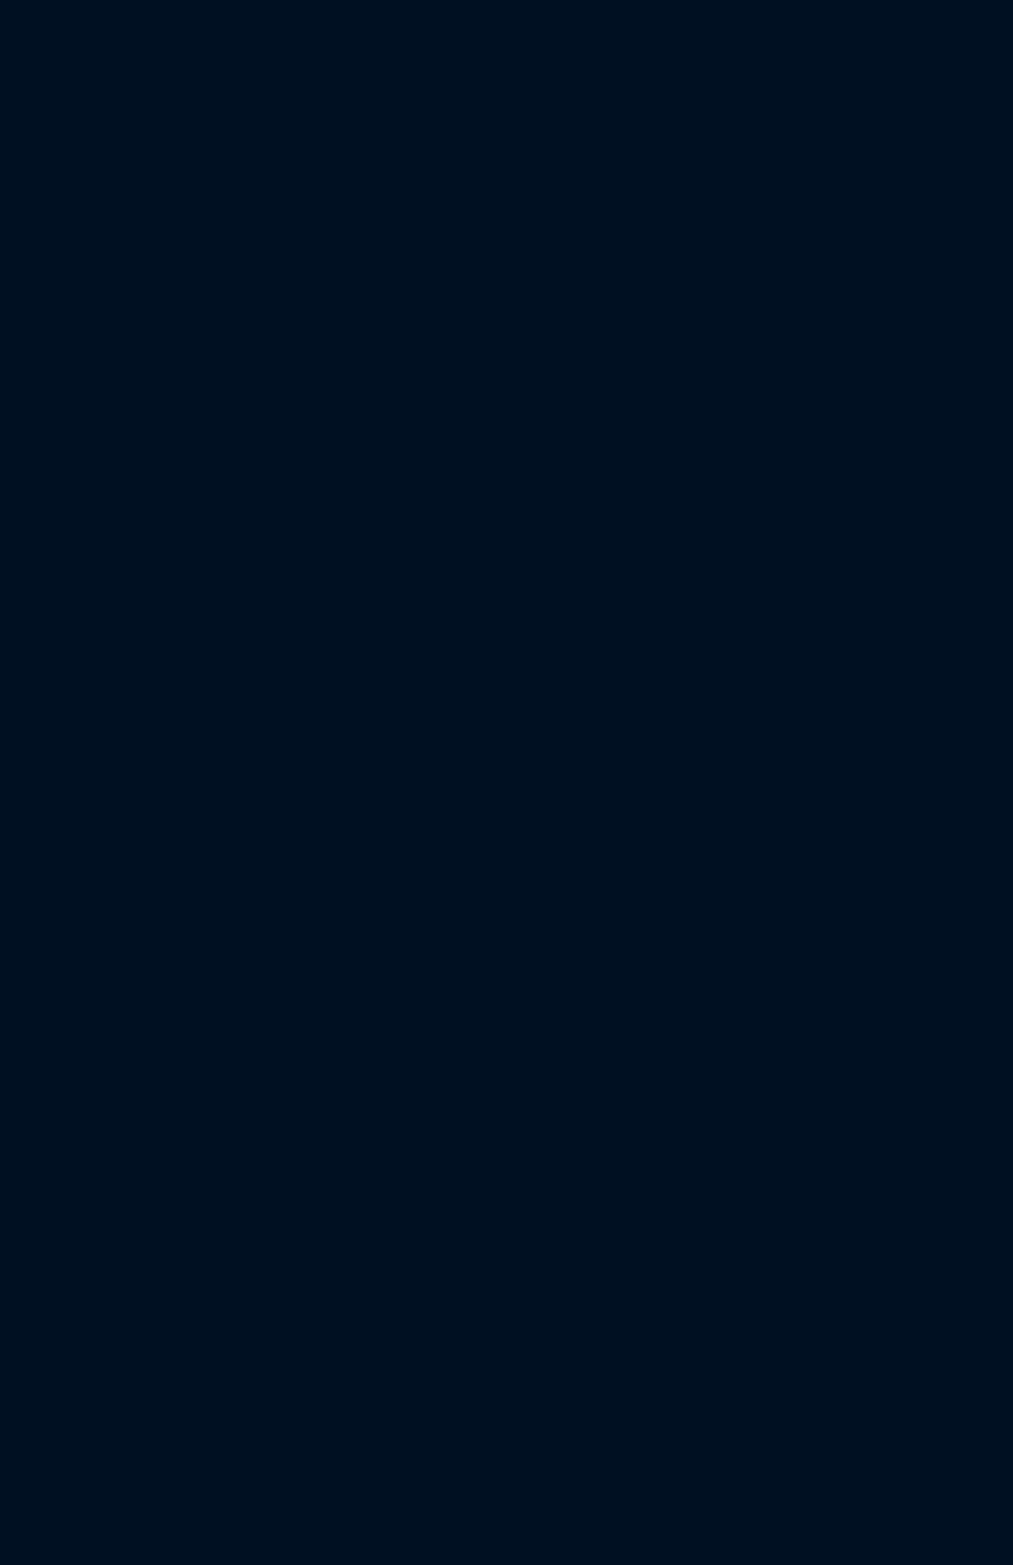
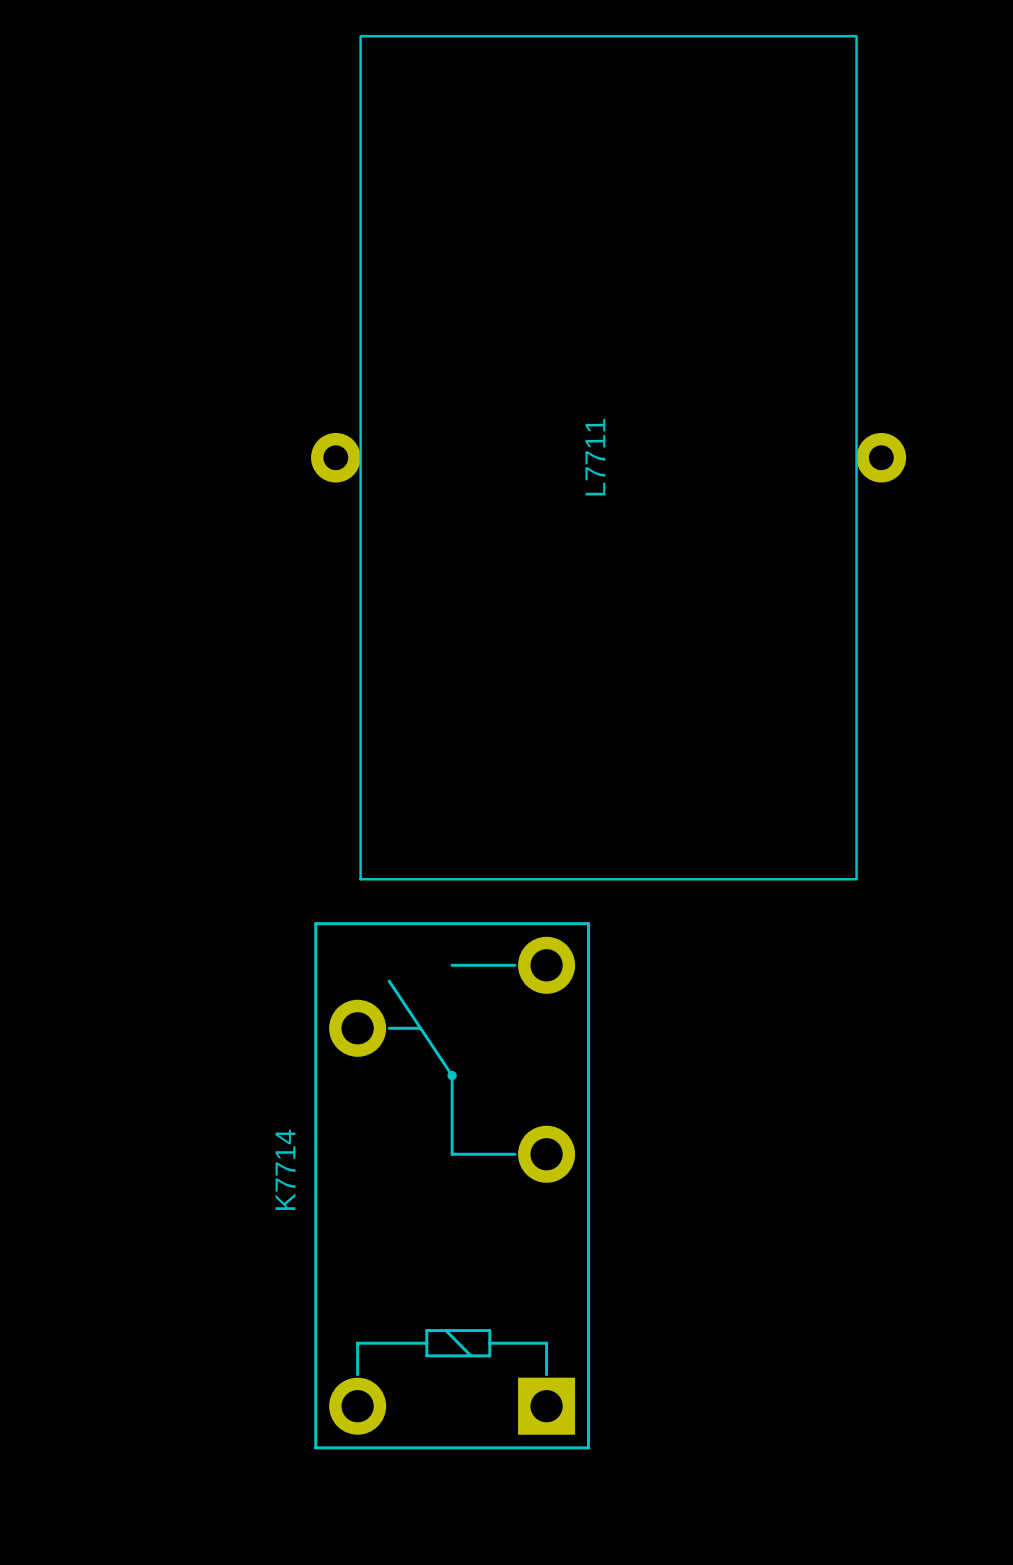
L7711: none -> (608, 457)
K7714: none -> (452, 1185)

